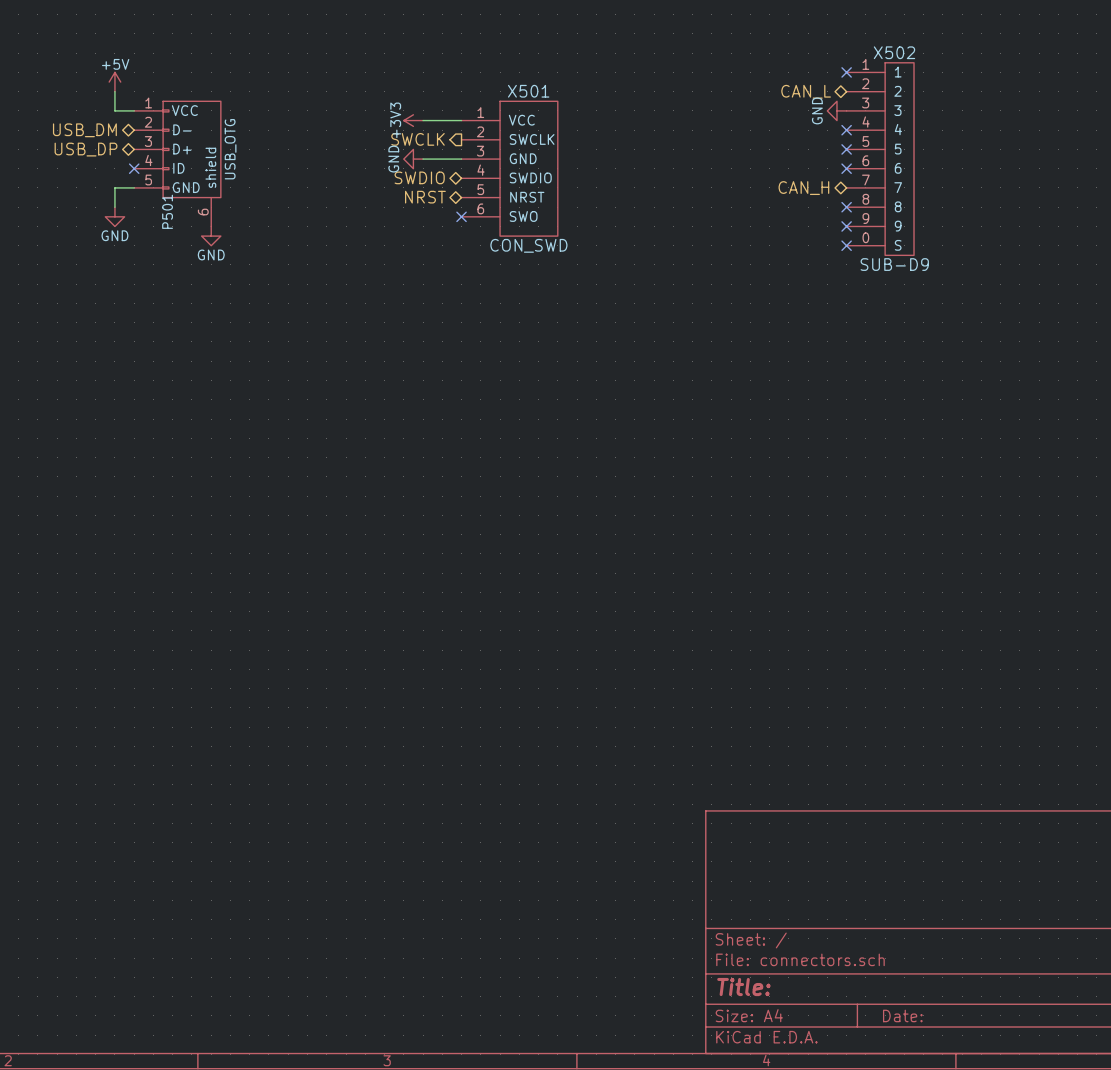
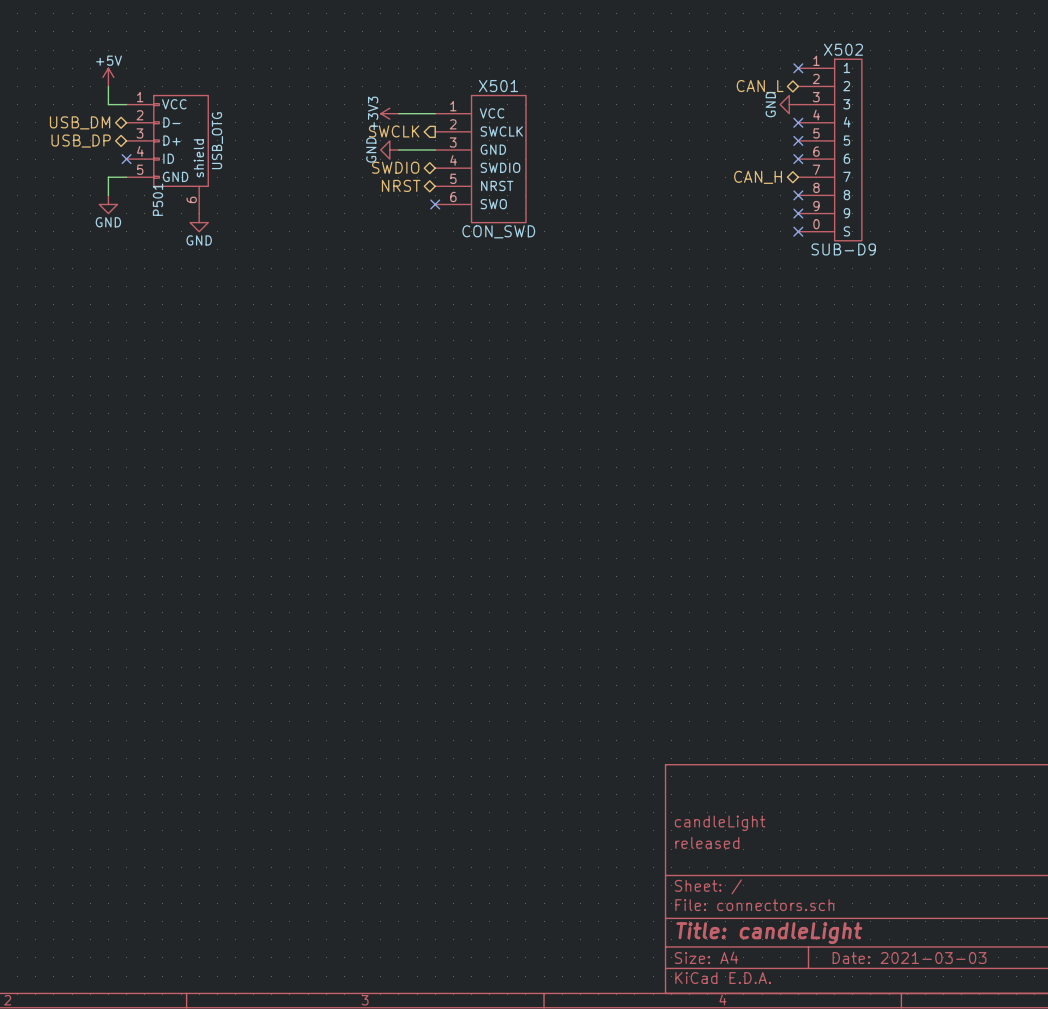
title block: none -> candleLight (720, 823)
title block: none -> released (707, 842)
title block: Title: (743, 987) -> Title: candleLight (769, 933)
title block: Date: (902, 1015) -> Date: 2021-03-03 (909, 958)

